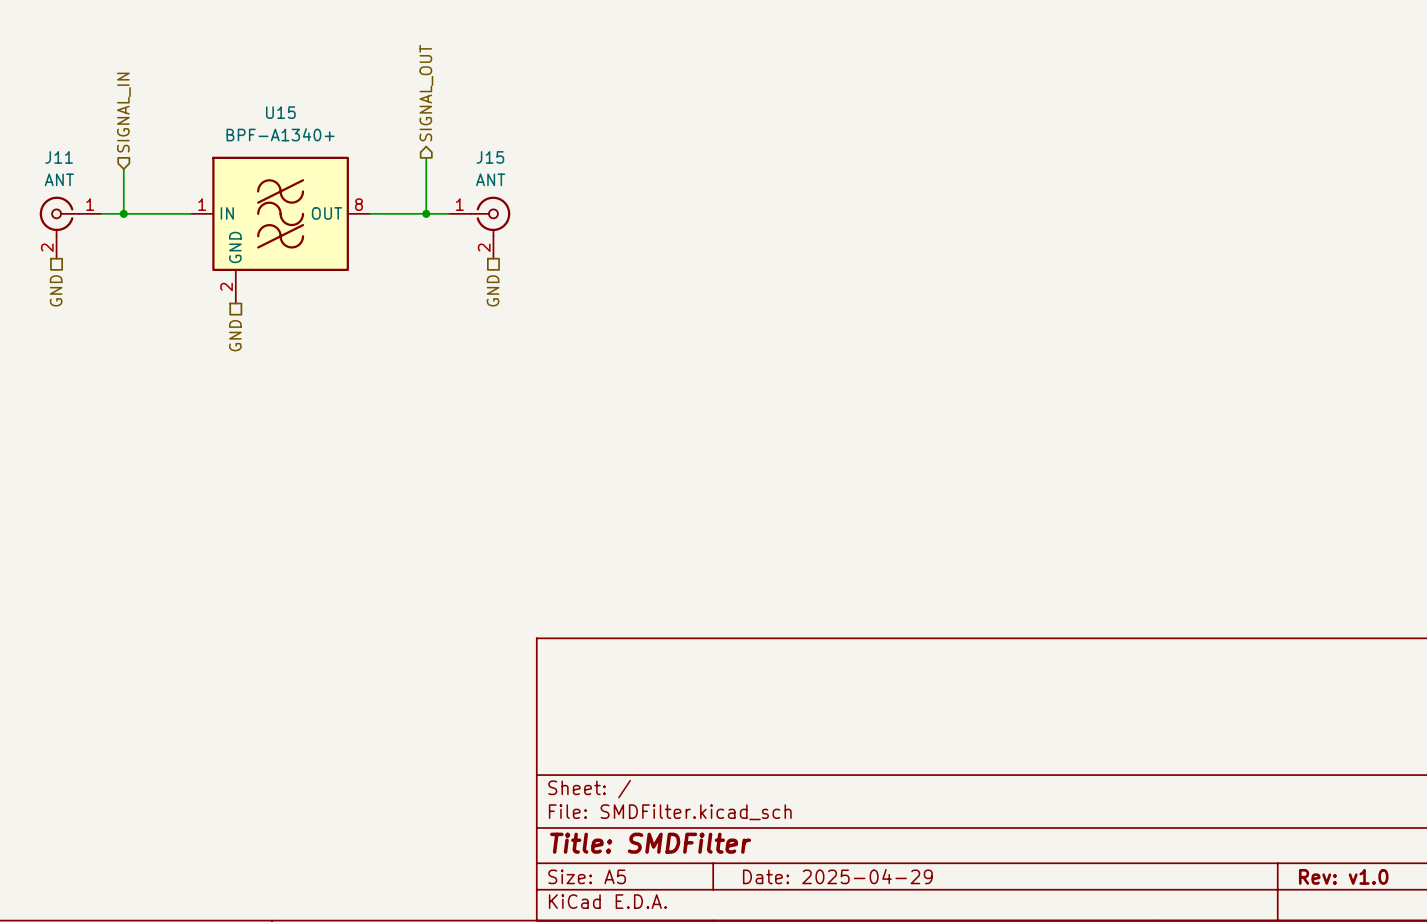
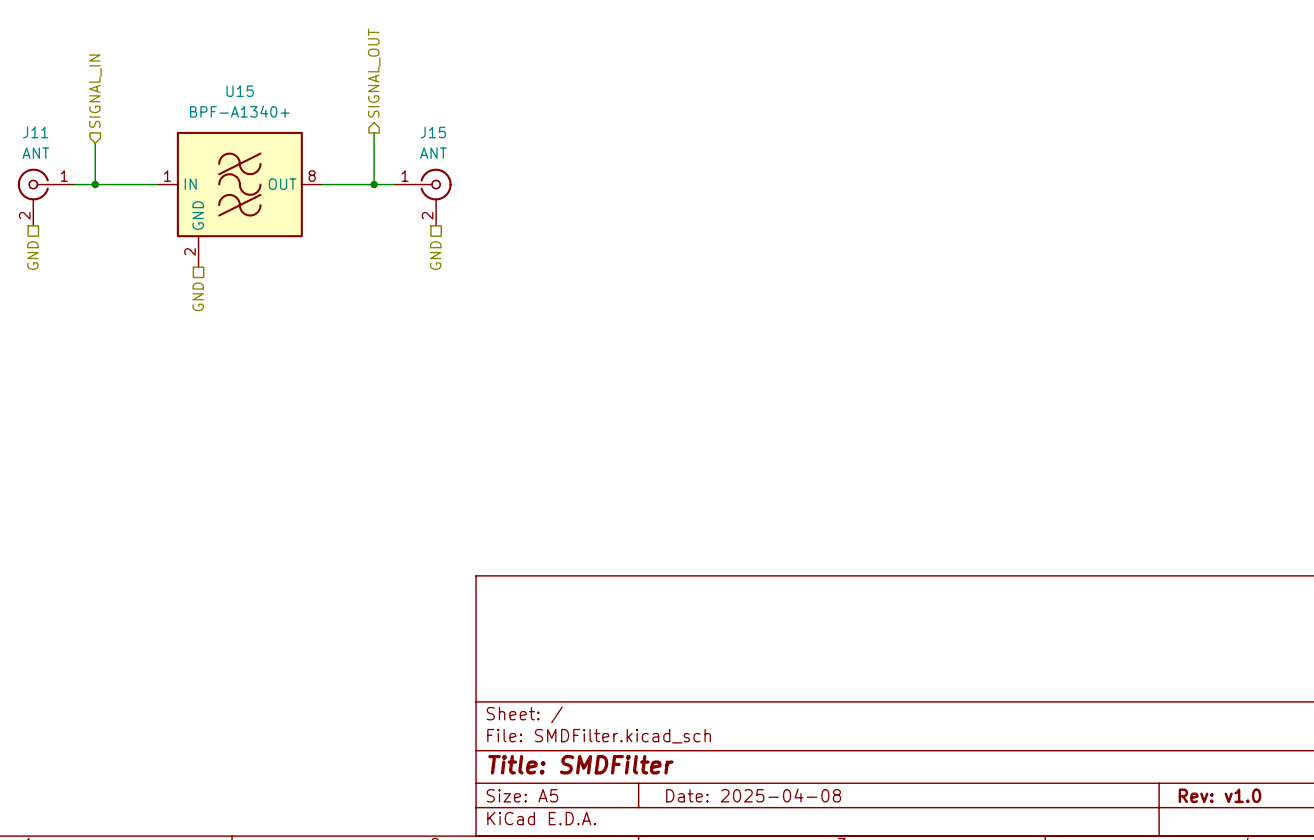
title block: Date: 2025-04-29 (837, 876) -> Date: 2025-04-08 (753, 795)

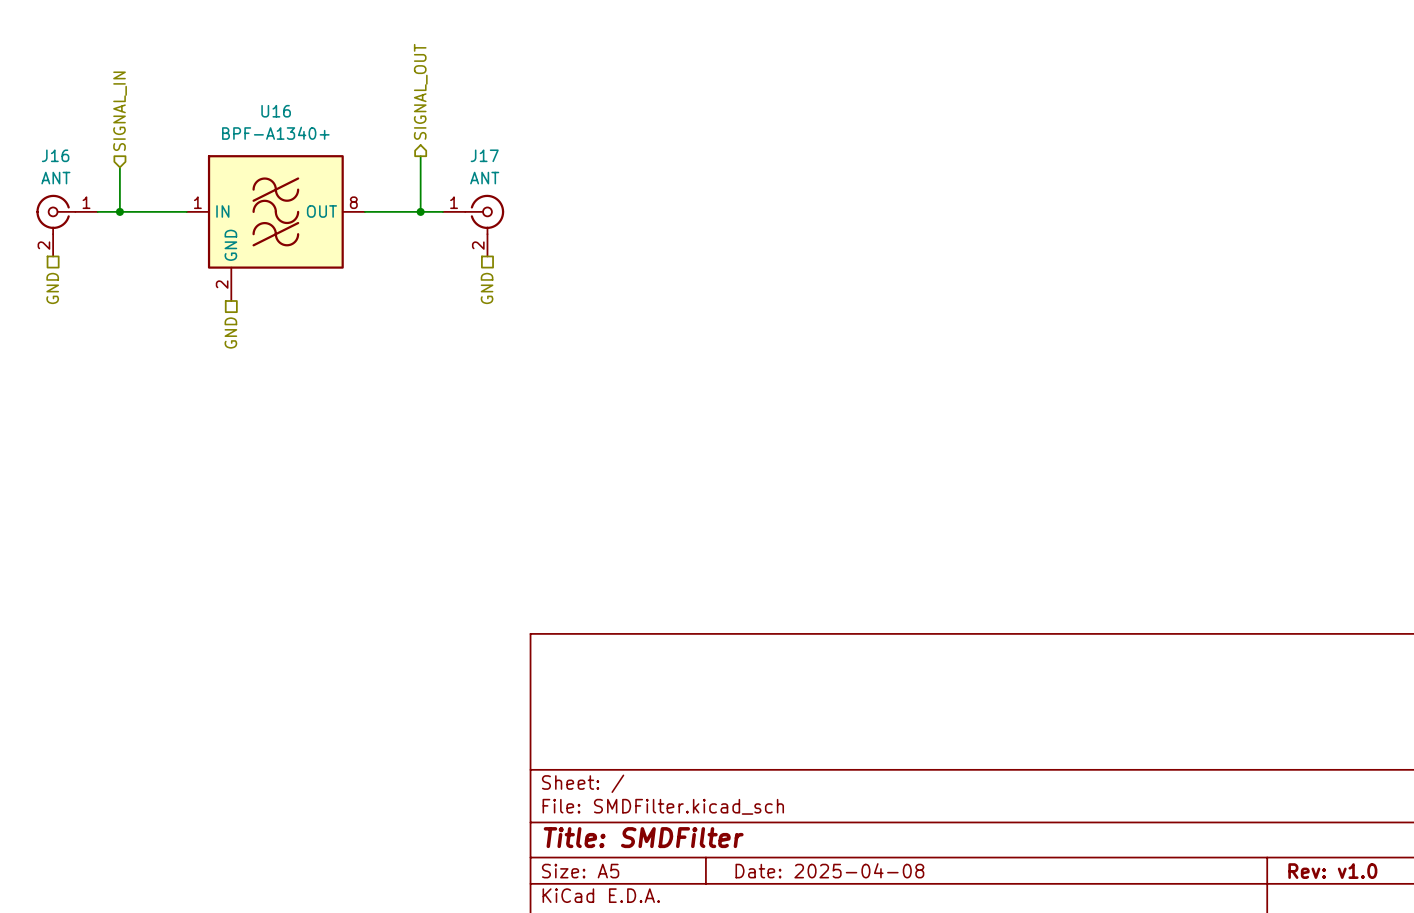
U15 name: U15 (240, 91) -> U16 (276, 111)
J11 name: J11 (35, 132) -> J16 (55, 155)
J15 name: J15 (433, 132) -> J17 (484, 155)

